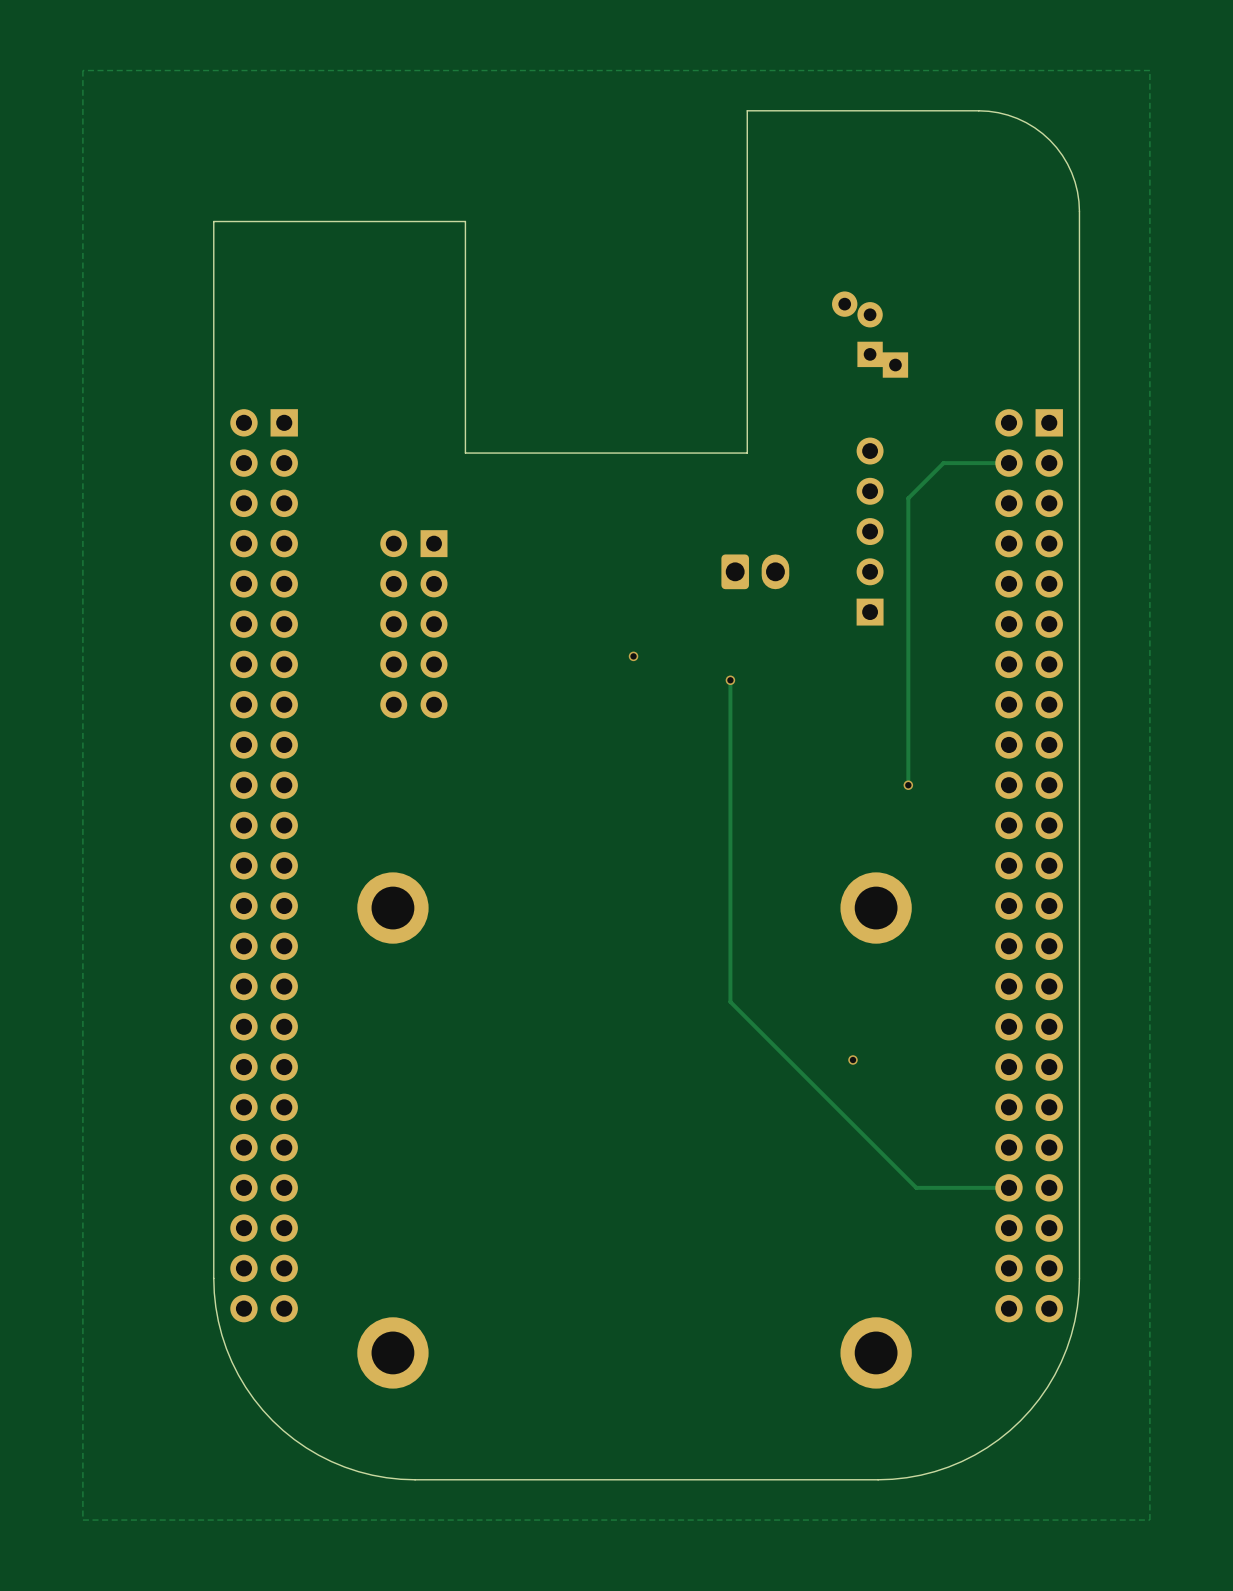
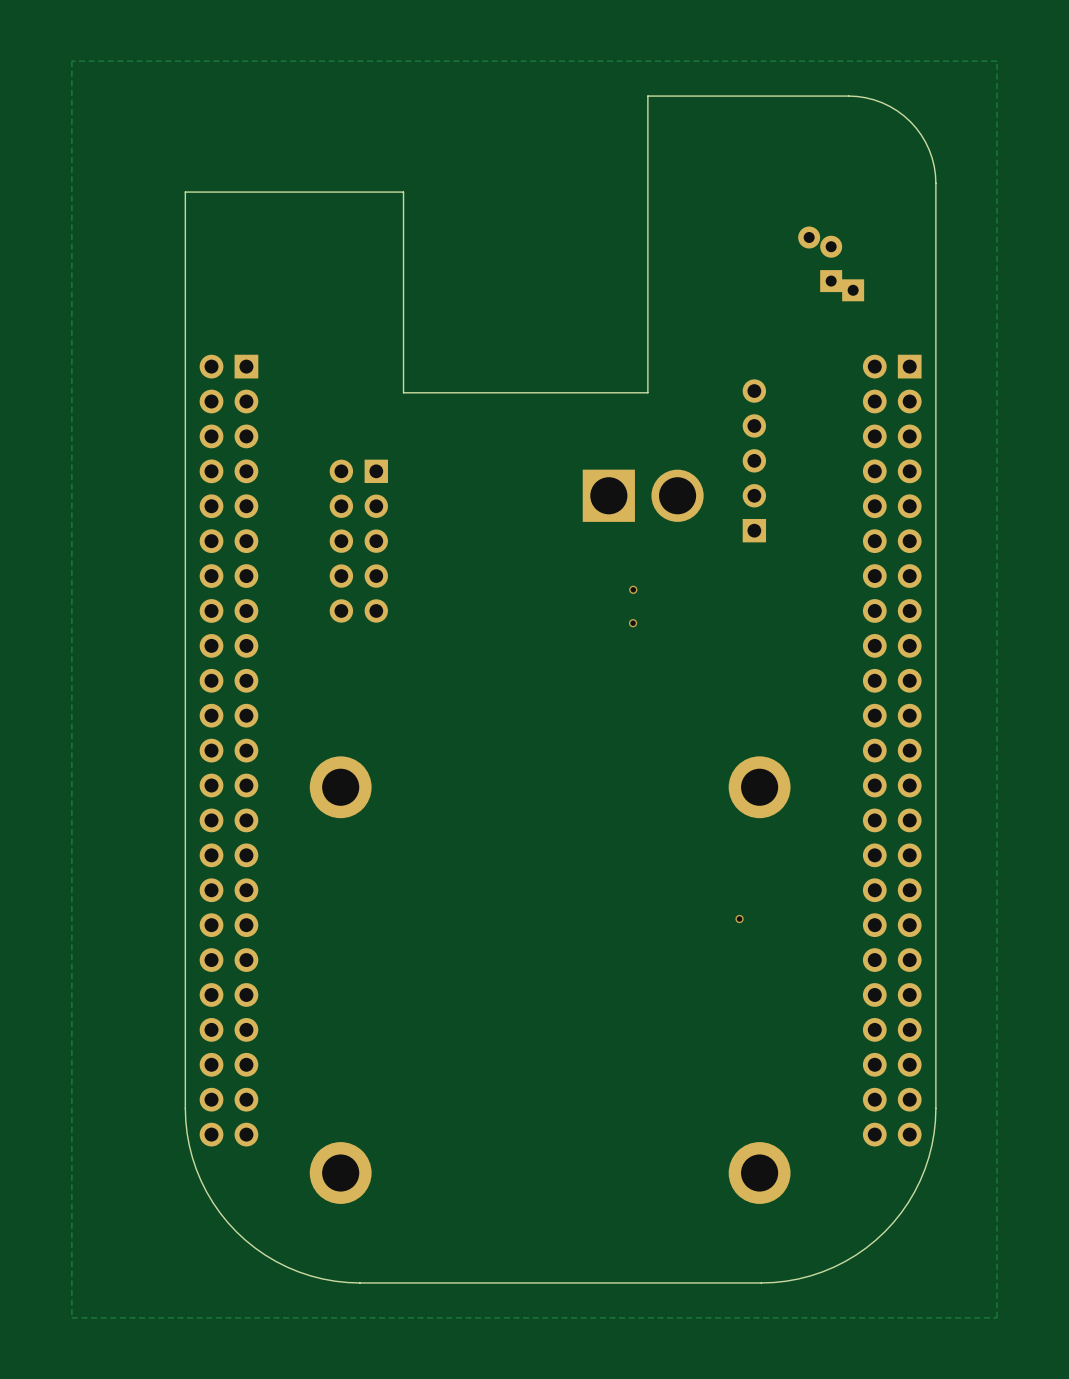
part position: (870, 334) -> (831, 263)
track: (1008, 463) (943, 463) (908, 498) (908, 785) -> none
part footprint: [721, 554, 790, 590] -> [582, 469, 704, 522]
via: (633, 656) -> none
track: (730, 680) (730, 1001) (916, 1187) (1008, 1187) -> none
via: none -> (633, 623)
via: (908, 785) -> none

